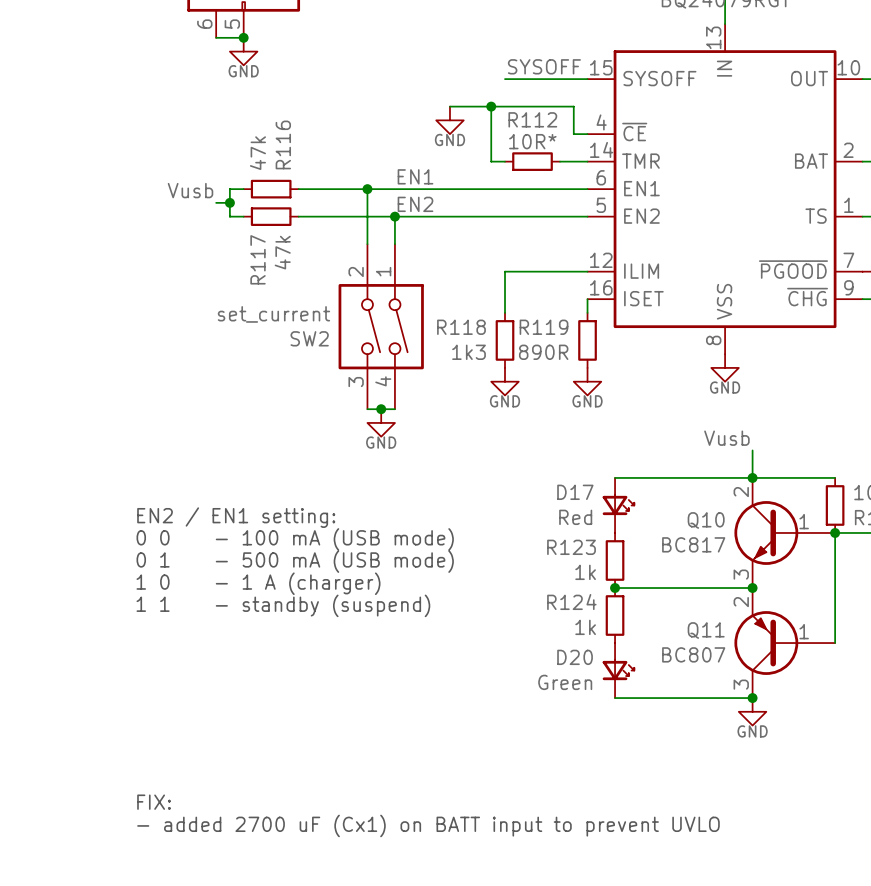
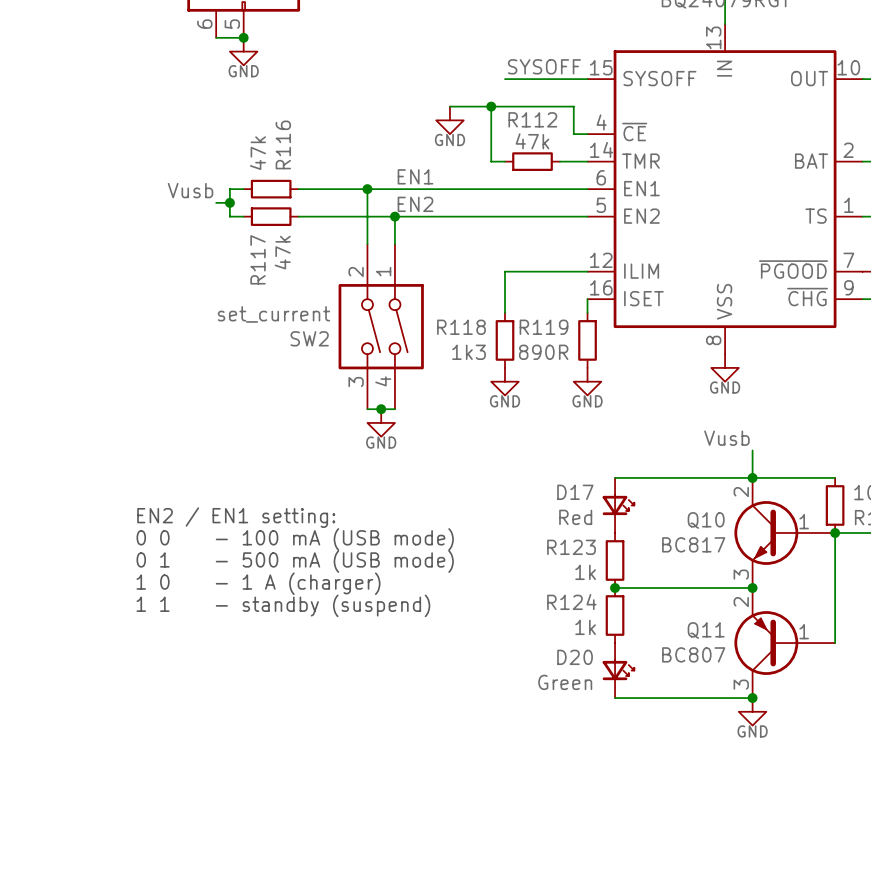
R112 value: 10R* (532, 141) -> 47k (532, 141)
text: FIX: (154, 802) -> none
text: - added 2700 uF (Cx1) on BATT input to prevent UVLO (428, 825) -> none

